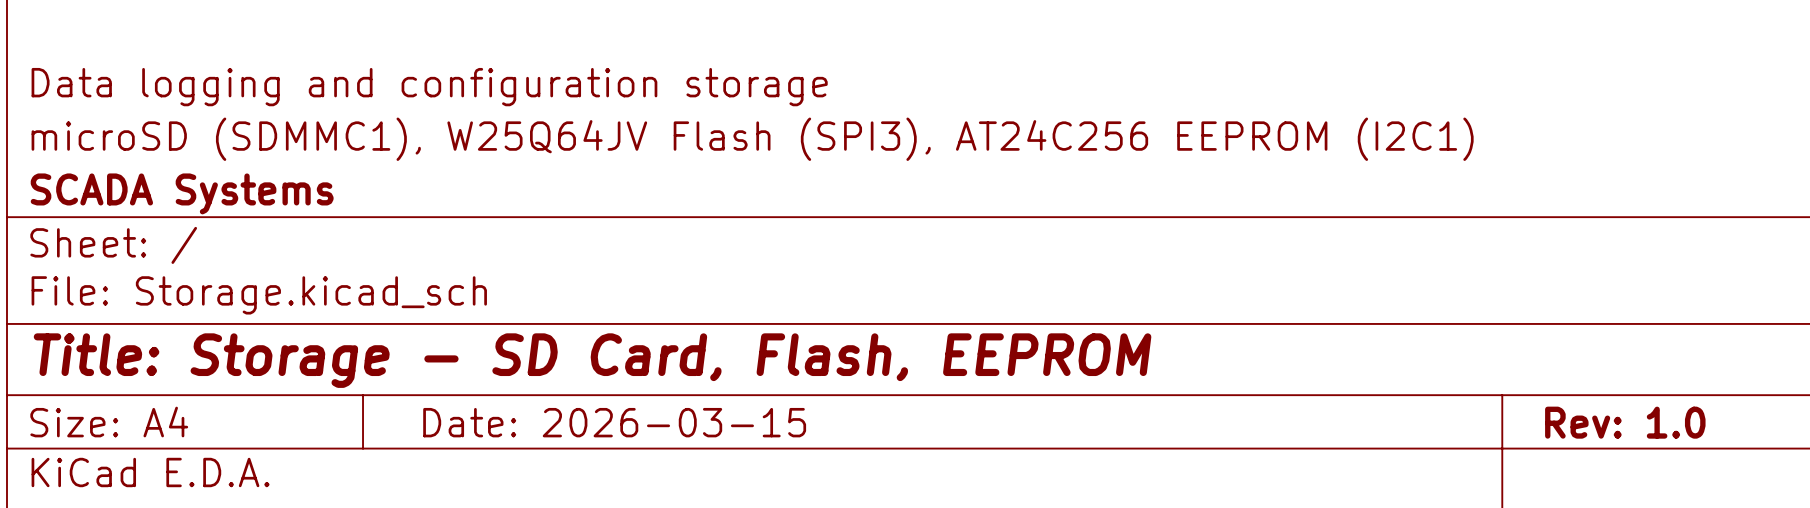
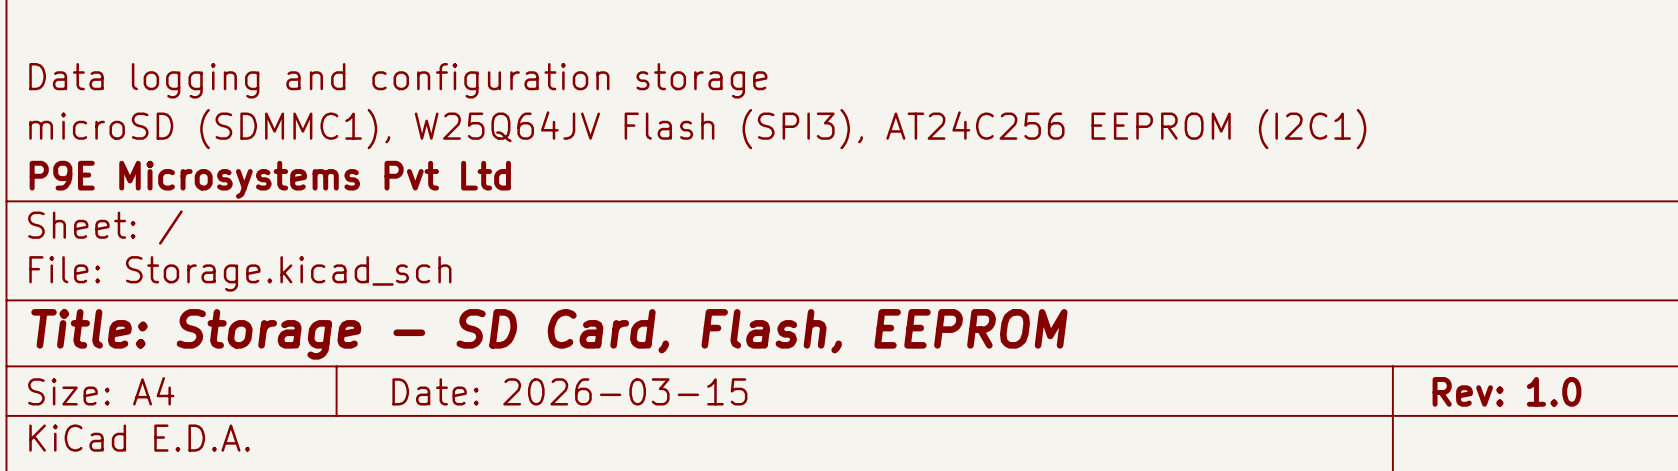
title block: SCADA Systems (182, 193) -> P9E Microsystems Pvt Ltd (270, 179)

